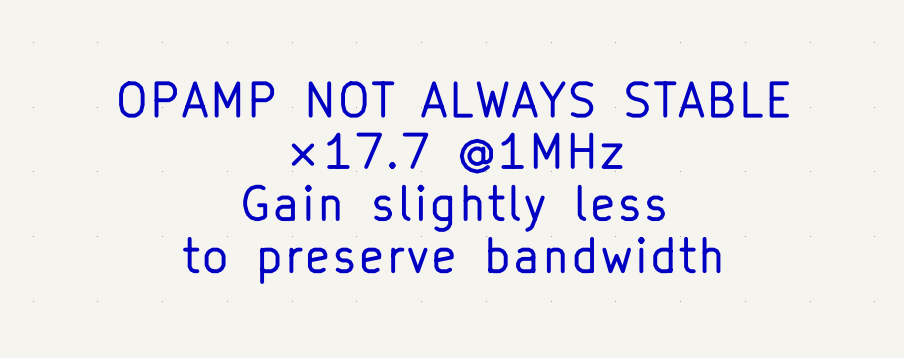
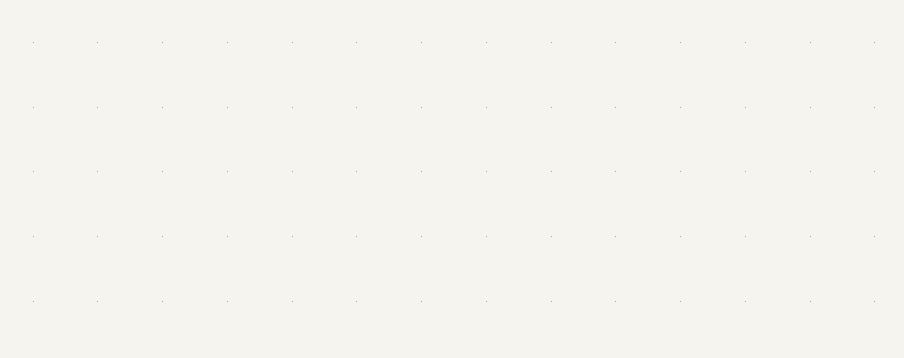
text: OPAMP NOT ALWAYS STABLE (454, 99) -> none
text: ×17.7 @1MHz (457, 153) -> none
text: Gain slightly less (454, 208) -> none
text: to preserve bandwidth (451, 260) -> none

